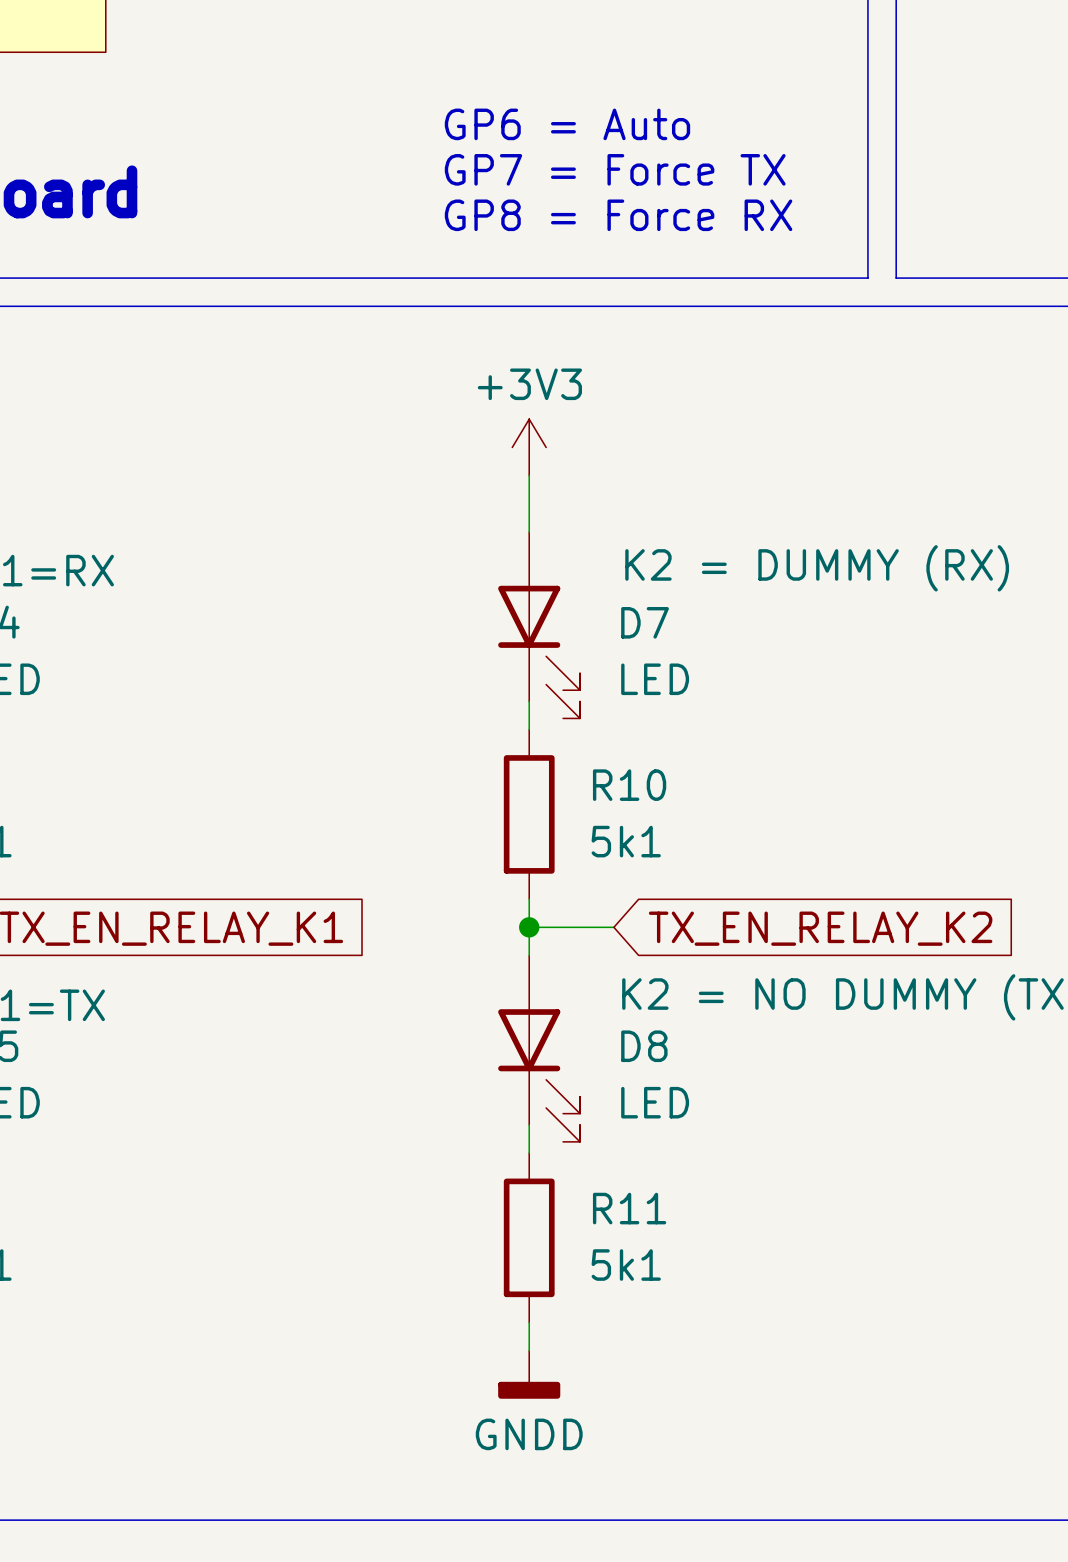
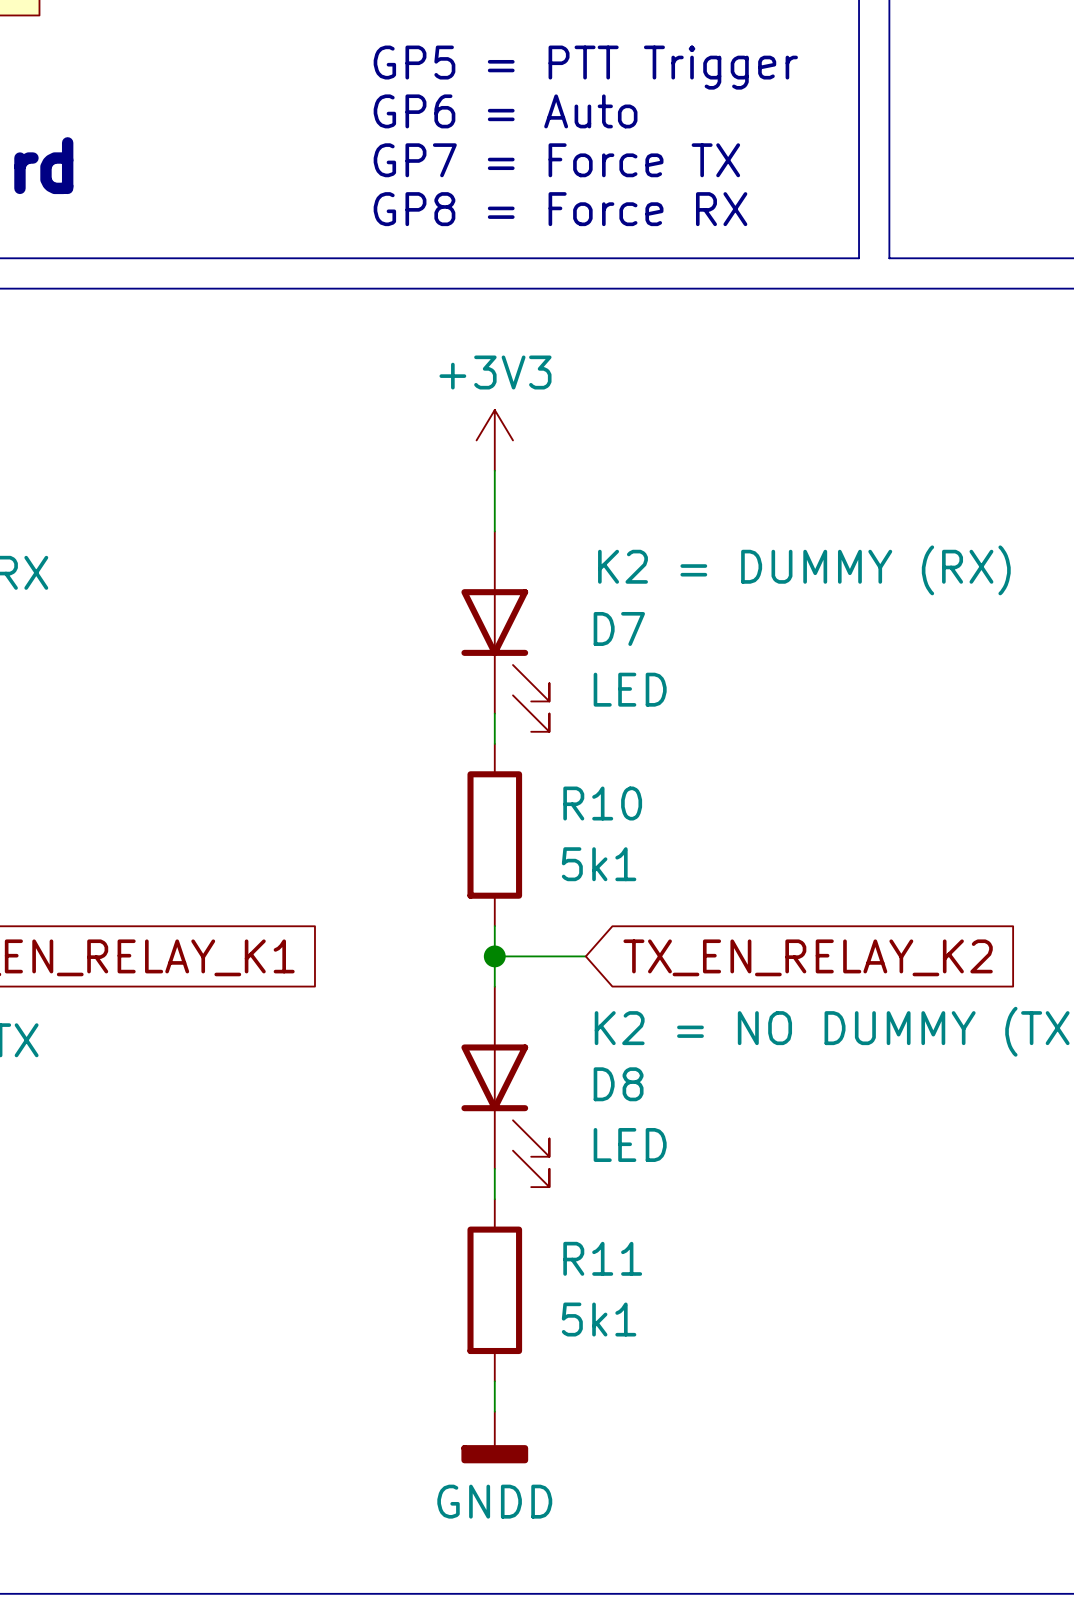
text: none -> GP5 = PTT Trigger (585, 67)
text position: GP6 = Auto (567, 124) -> GP6 = Auto (505, 111)
text position: GP7 = Force TX (615, 169) -> GP7 = Force TX (556, 160)
text position: GP8 = Force RX (618, 215) -> GP8 = Force RX (560, 209)

